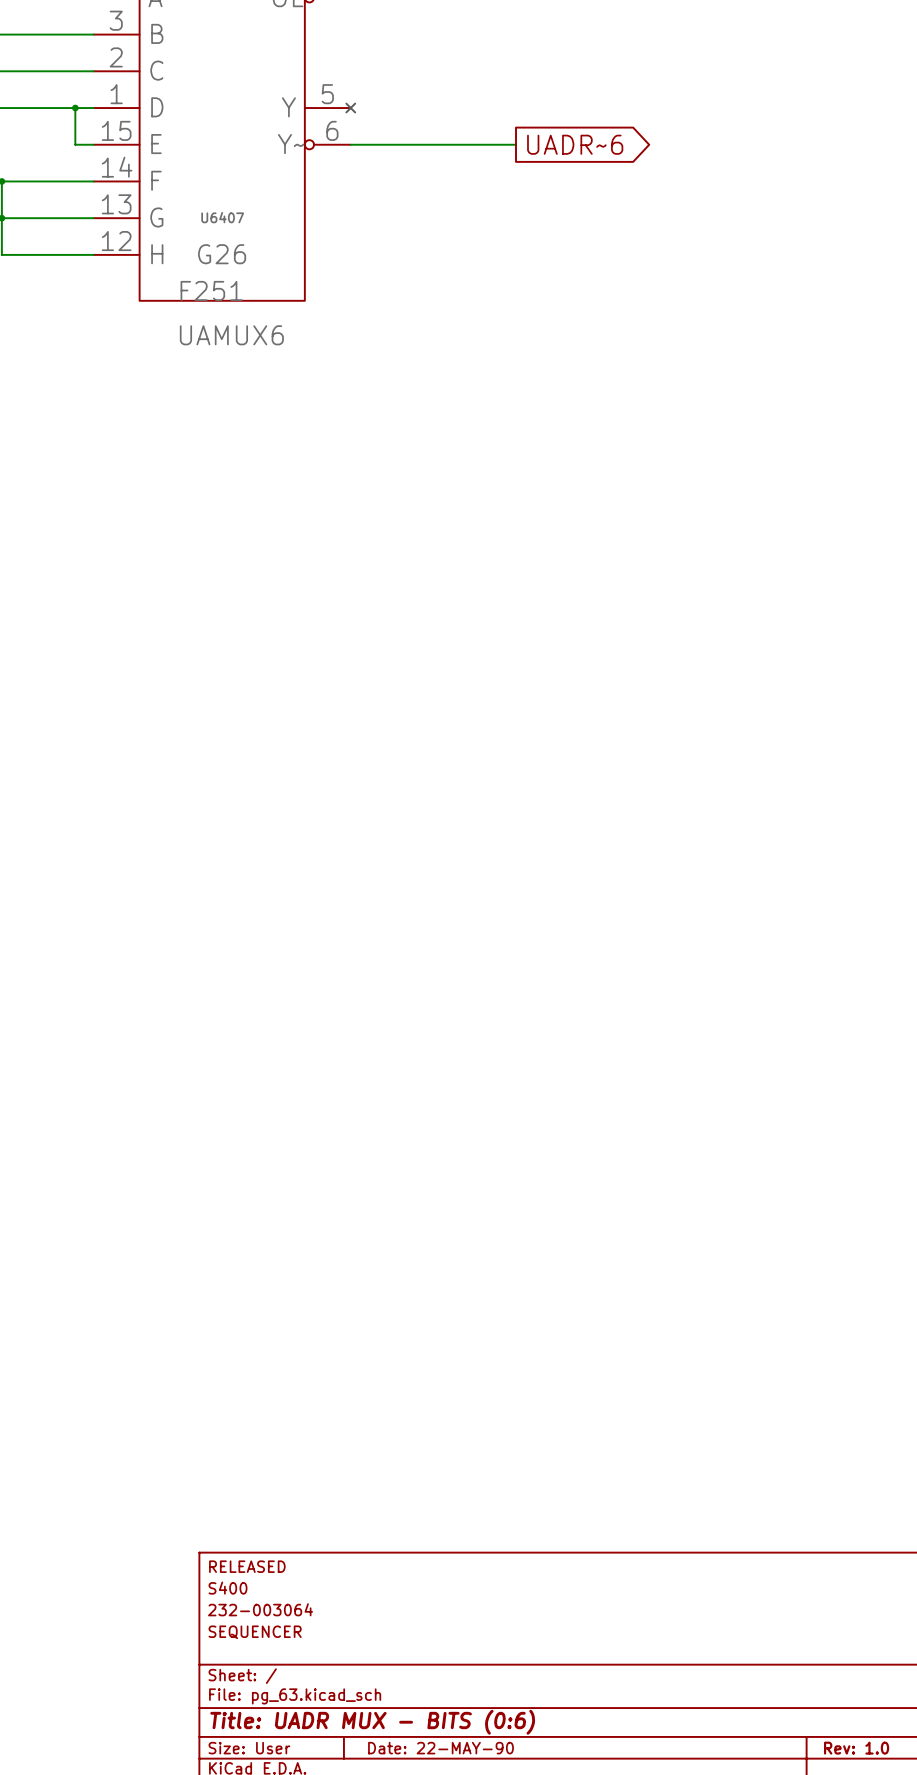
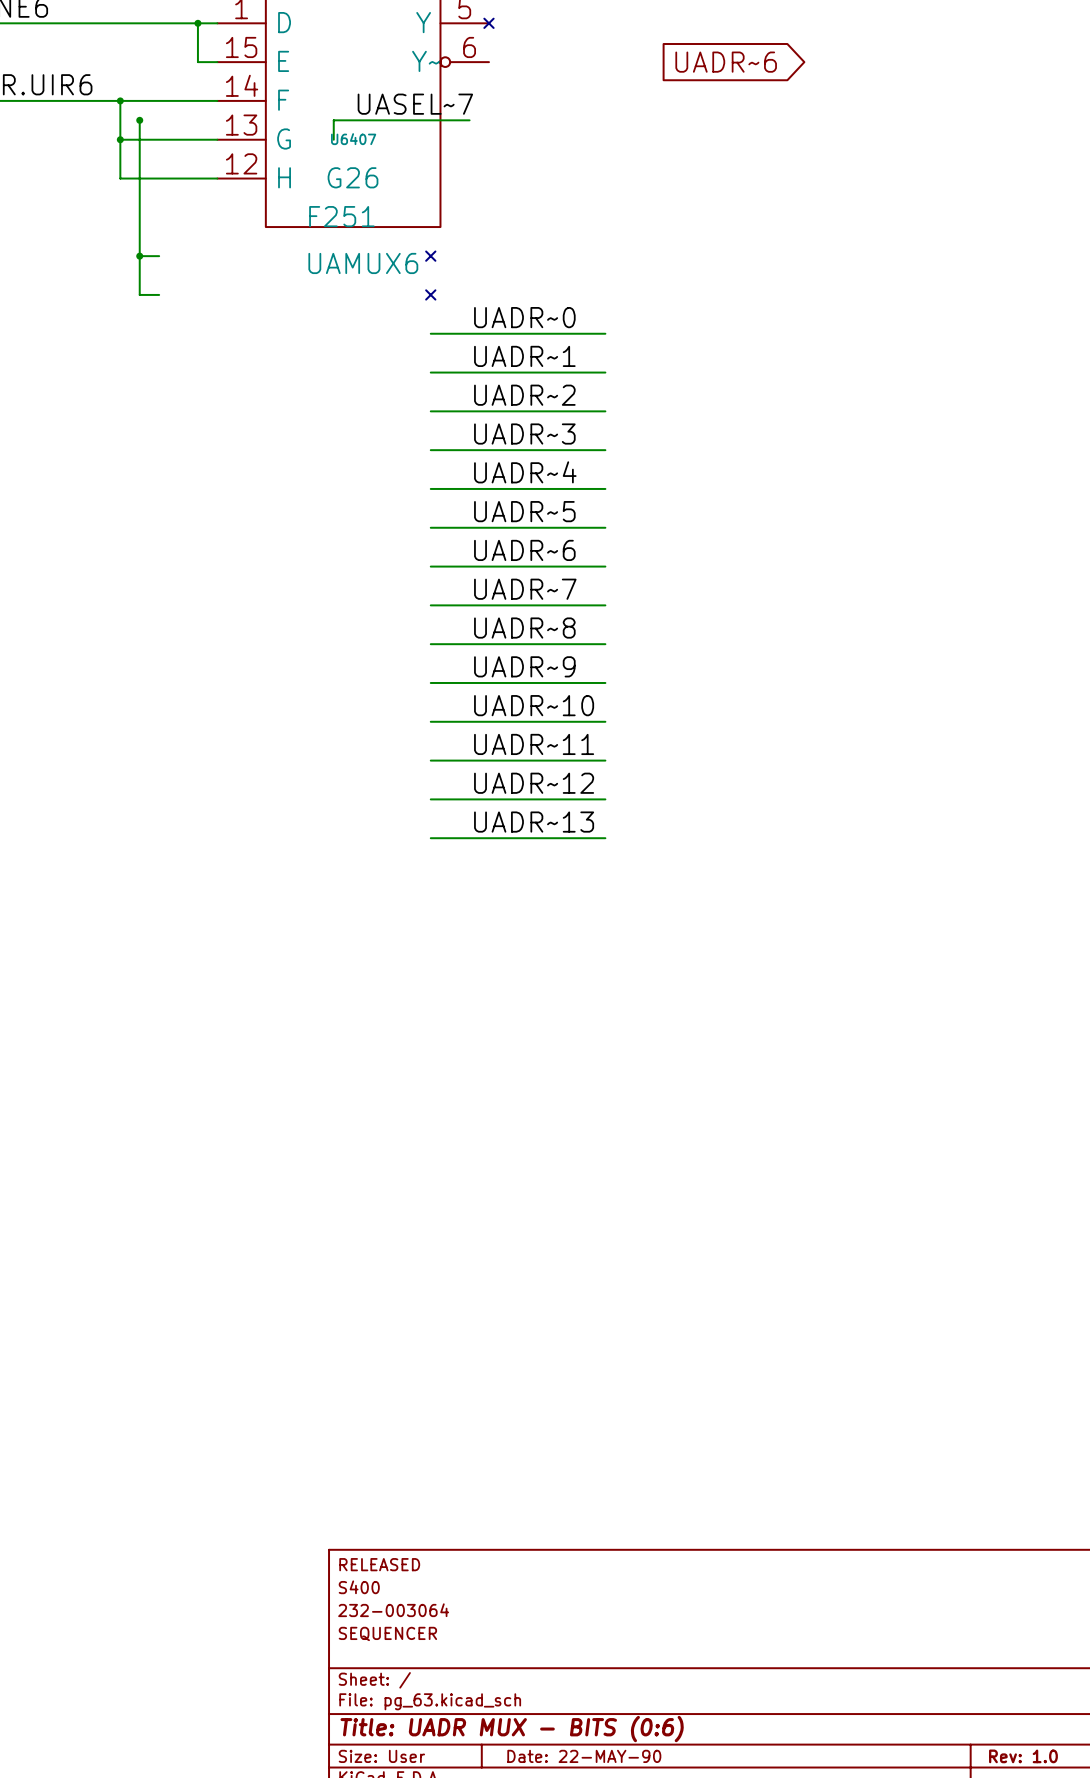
wire: (350, 144) (516, 144) -> none
label: none -> UASEL~7 (415, 104)
wire: none -> (139, 120) (139, 294) (159, 294)
junction: none -> (139, 120)
wire: none -> (469, 120) (333, 120) (333, 139)
wire: none -> (139, 256) (159, 256)
junction: none -> (139, 256)
no-connect mark: none -> (430, 256)
no-connect mark: none -> (430, 294)
label: none -> UADR~0 (524, 317)
wire: none -> (430, 333) (605, 333)
label: none -> UADR~1 (524, 356)
wire: none -> (430, 372) (605, 372)
label: none -> UADR~2 (524, 395)
wire: none -> (430, 411) (605, 411)
label: none -> UADR~3 (524, 434)
wire: none -> (430, 450) (605, 450)
label: none -> UADR~4 (525, 472)
wire: none -> (430, 488) (605, 488)
label: none -> UADR~5 (524, 511)
wire: none -> (430, 527) (605, 527)
label: none -> UADR~6 (524, 550)
wire: none -> (430, 566) (605, 566)
label: none -> UADR~7 (525, 589)
wire: none -> (430, 605) (605, 605)
label: none -> UADR~8 (524, 628)
wire: none -> (430, 644) (605, 644)
label: none -> UADR~9 (524, 666)
wire: none -> (430, 682) (605, 682)
label: none -> UADR~10 (534, 705)
wire: none -> (430, 721) (605, 721)
label: none -> UADR~11 (534, 744)
wire: none -> (430, 760) (605, 760)
label: none -> UADR~12 (534, 783)
wire: none -> (430, 799) (605, 799)
label: none -> UADR~13 (534, 822)
wire: none -> (430, 838) (605, 838)

